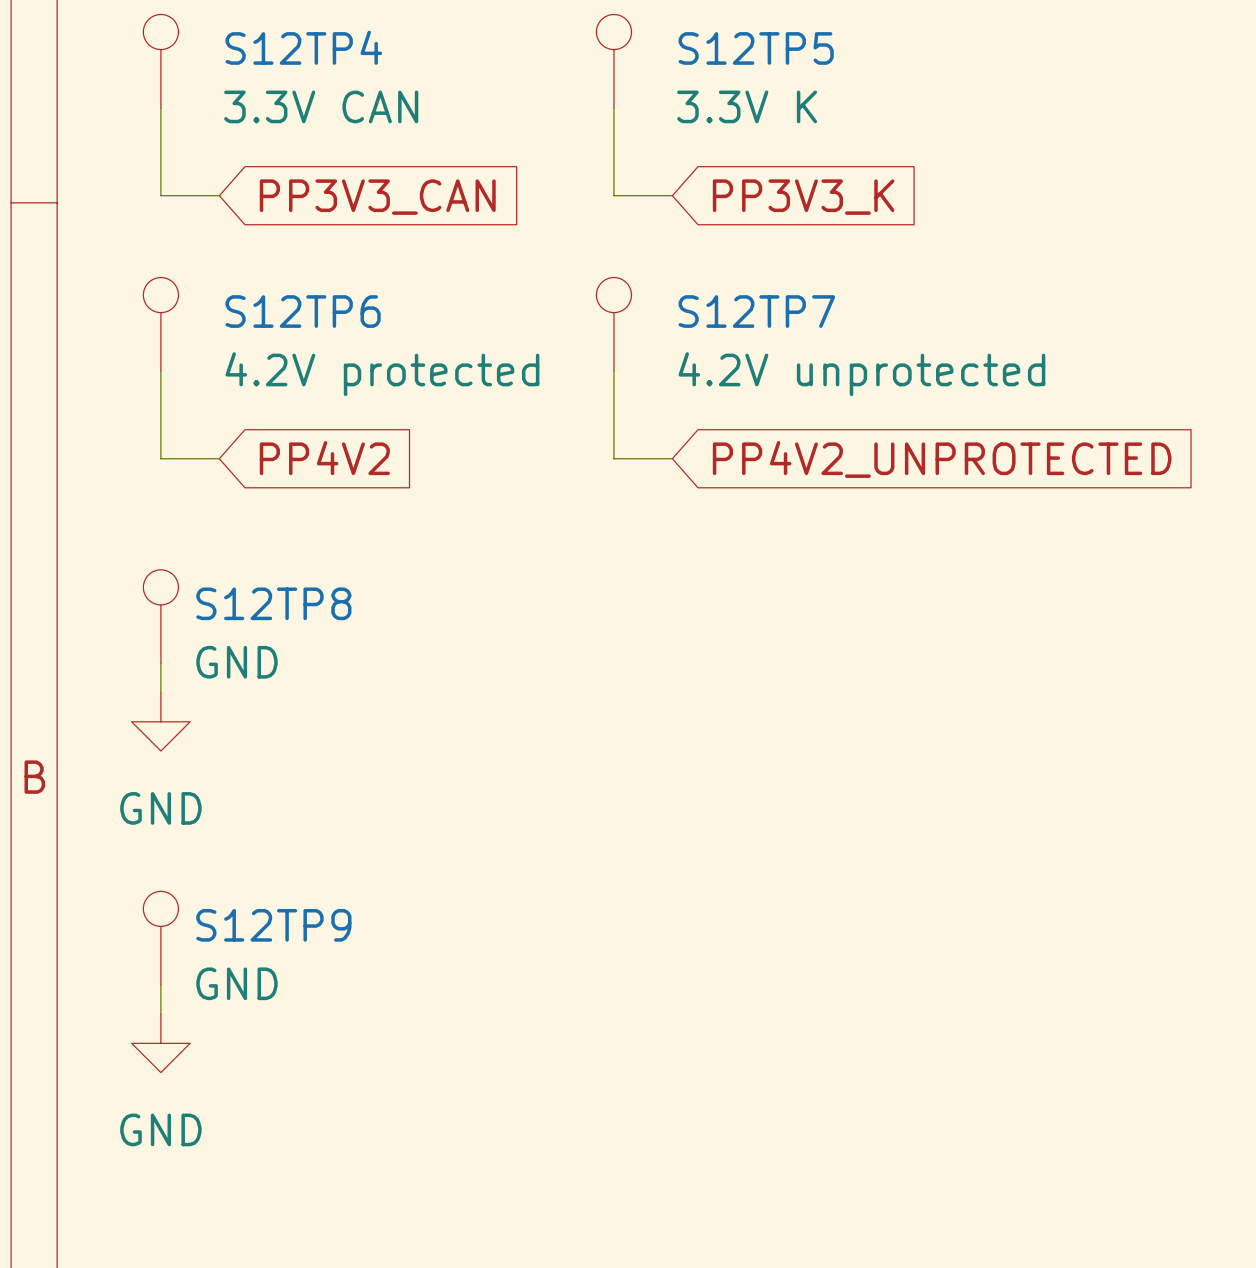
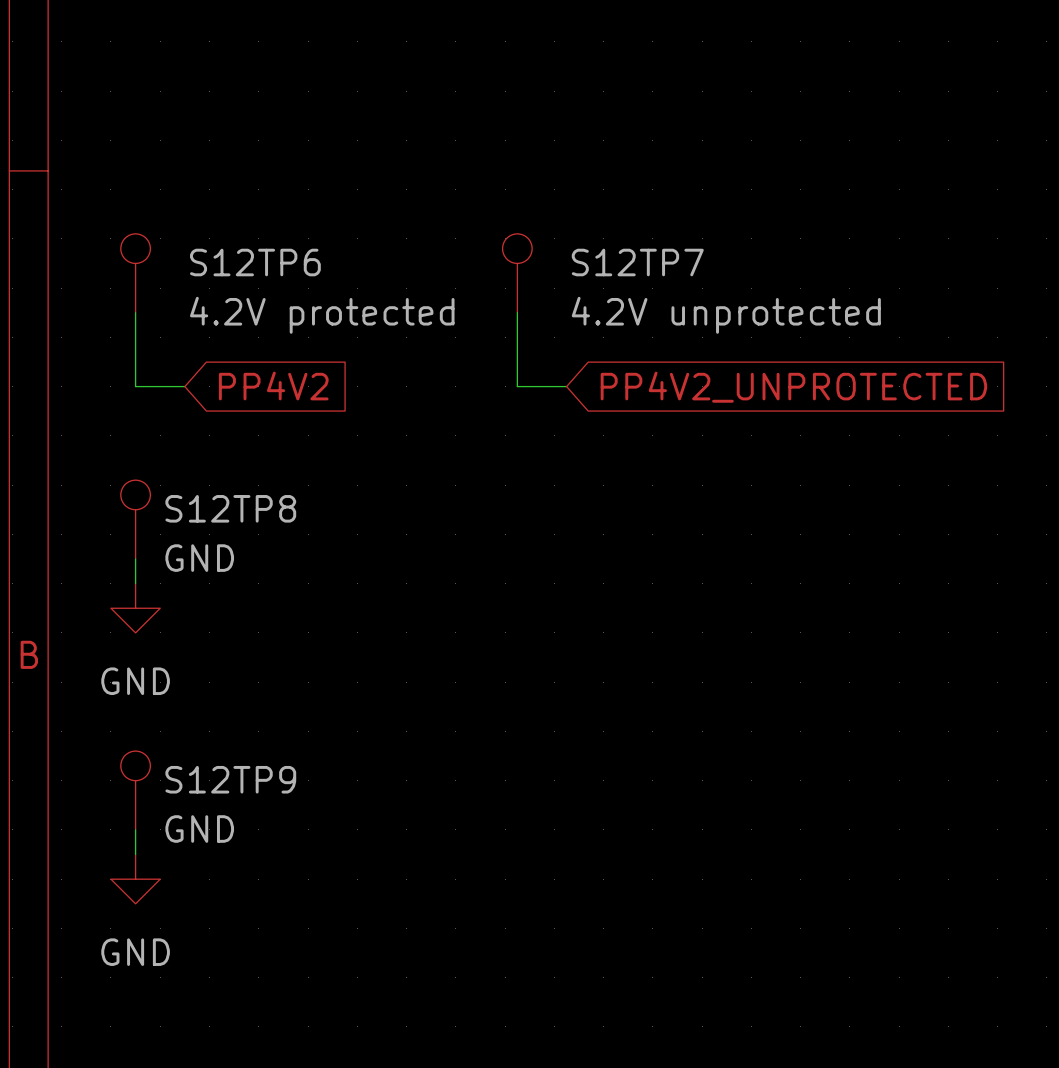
S12TP4: 3.3V CAN (160, 61) -> none
S12TP5: 3.3V K (613, 61) -> none
wire: (160, 108) (160, 195) (219, 195) -> none
wire: (613, 108) (613, 195) (672, 195) -> none
global label: PP3V3_CAN (377, 197) -> none
global label: PP3V3_K (803, 197) -> none

